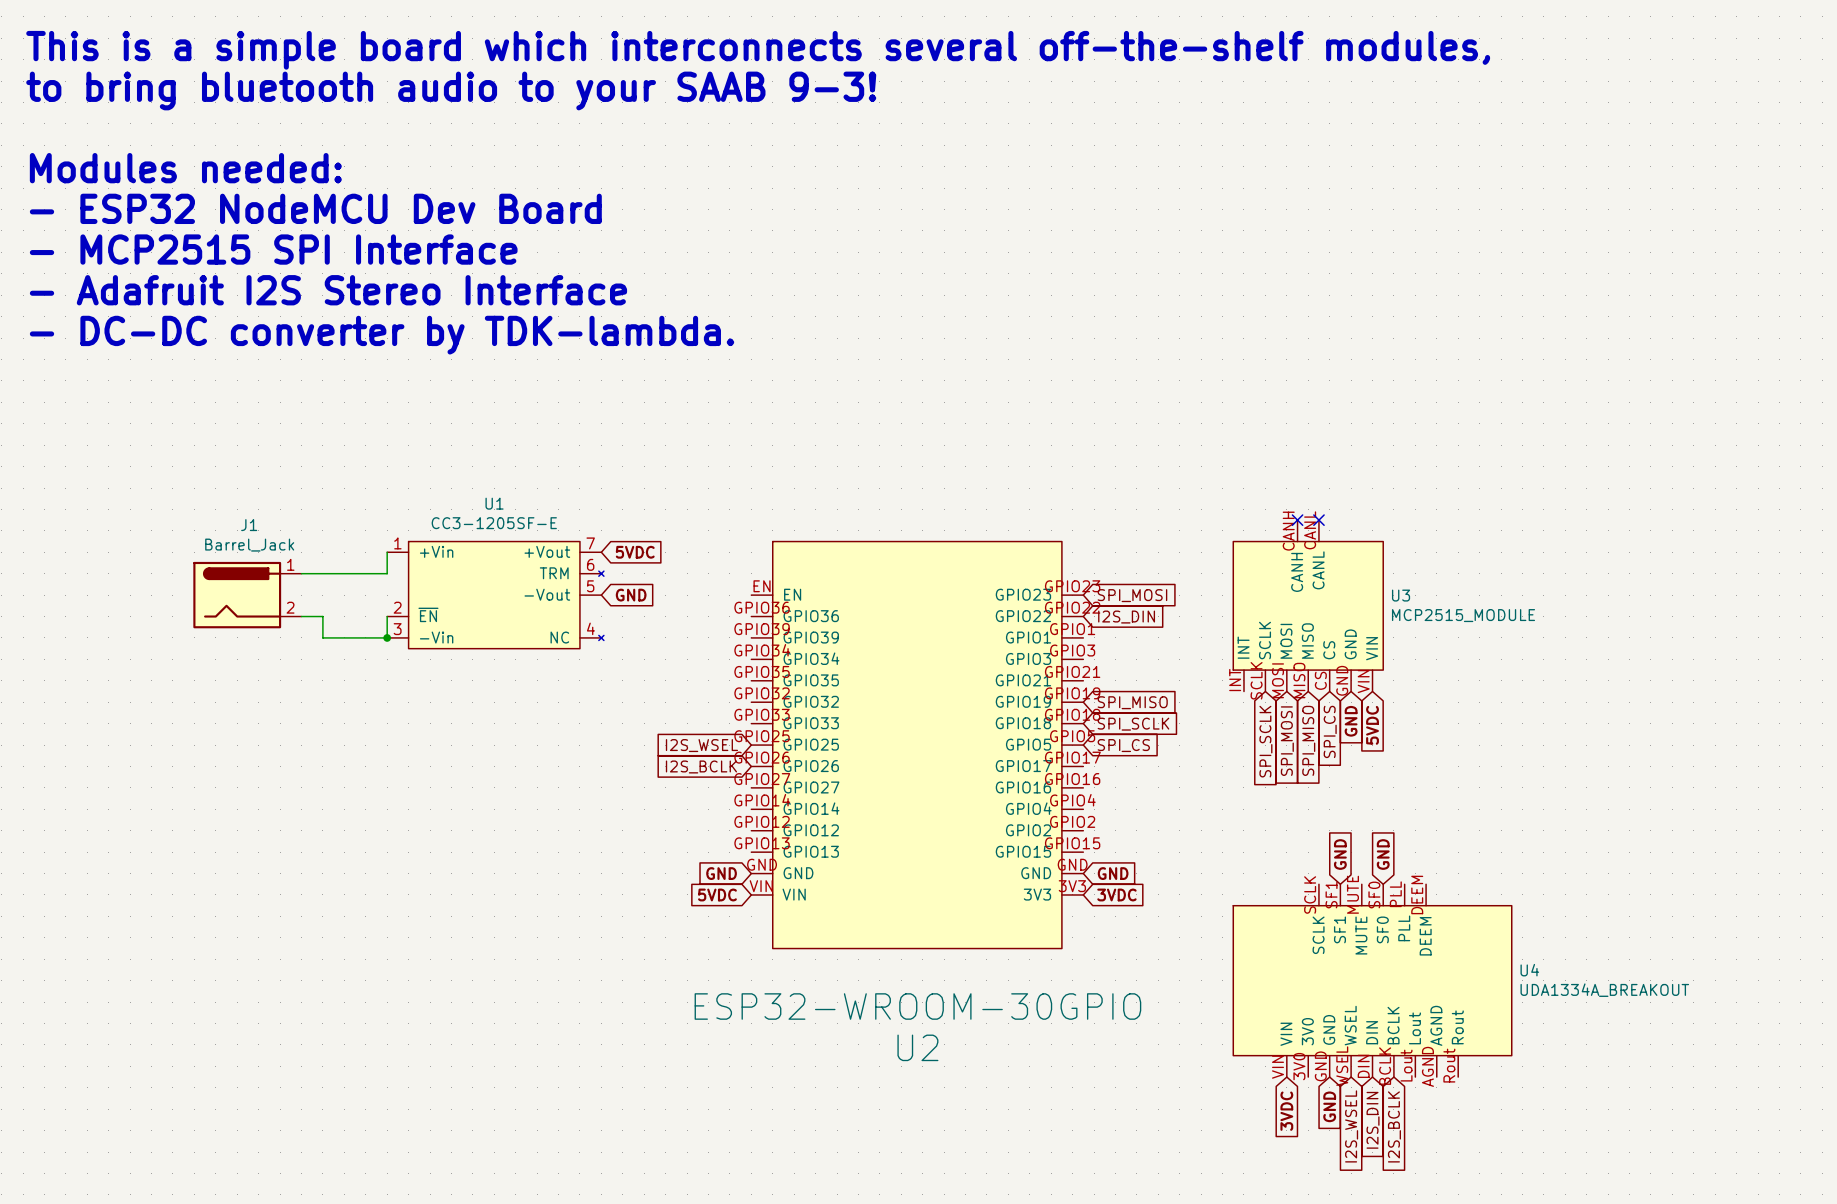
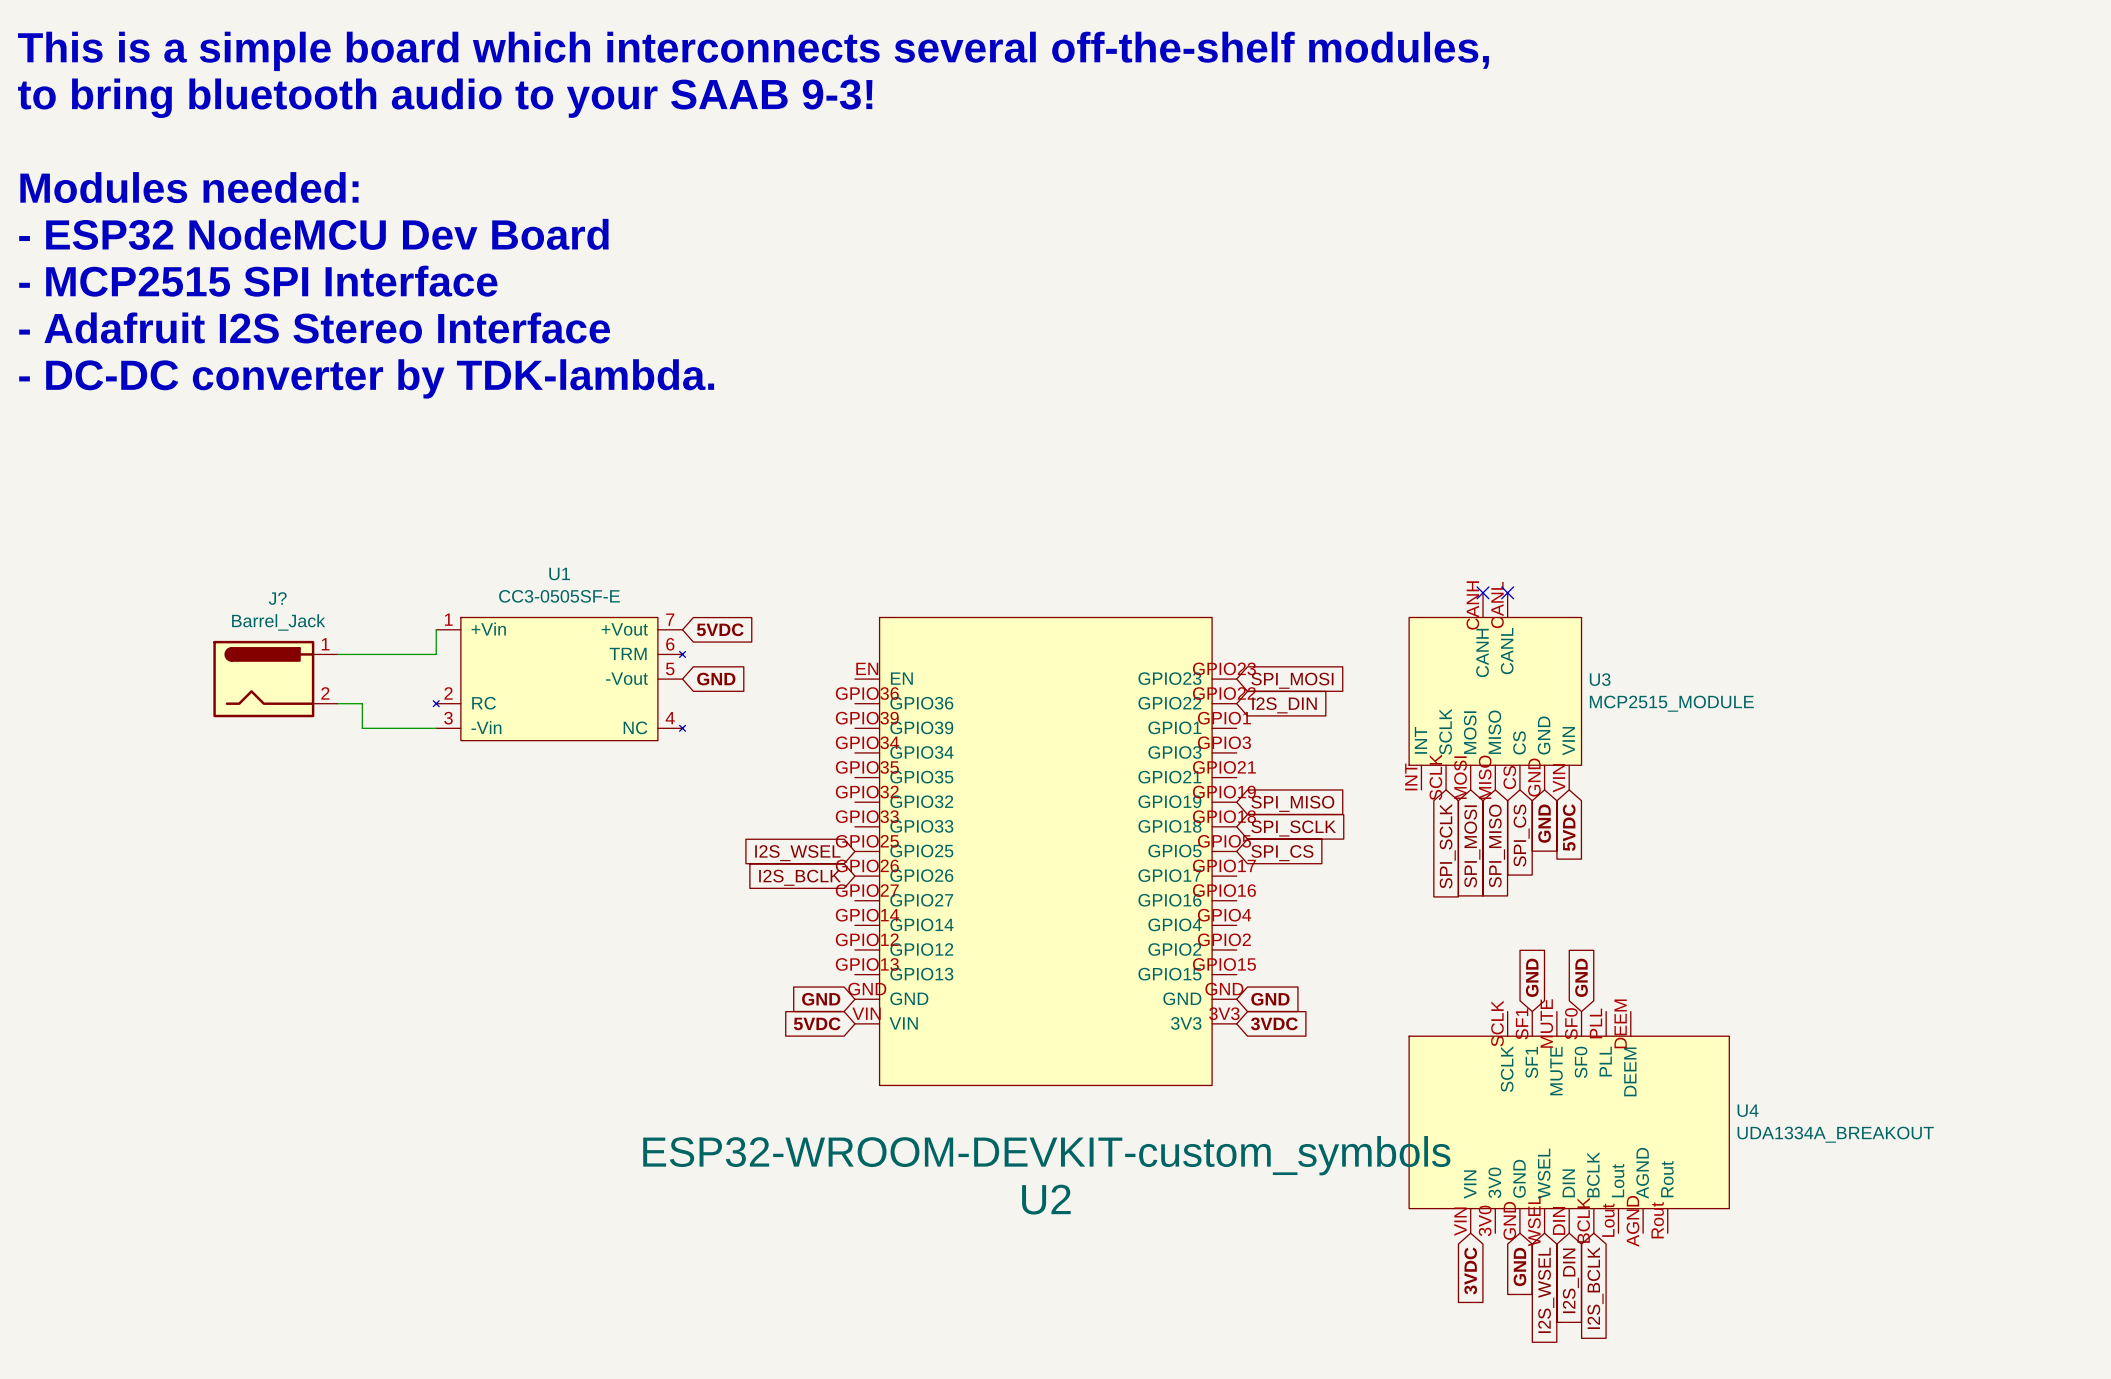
U1 value: CC3-1205SF-E (494, 523) -> CC3-0505SF-E (559, 596)
J1 name: J1 (249, 525) -> J? (277, 598)
U1 symbol: [387, 541, 604, 649] -> [433, 617, 686, 741]
wire: (387, 616) (387, 637) -> none
junction: (387, 637) -> none
U2 value: ESP32-WROOM-30GPIO (917, 1006) -> ESP32-WROOM-DEVKIT-custom_symbols (1046, 1155)

